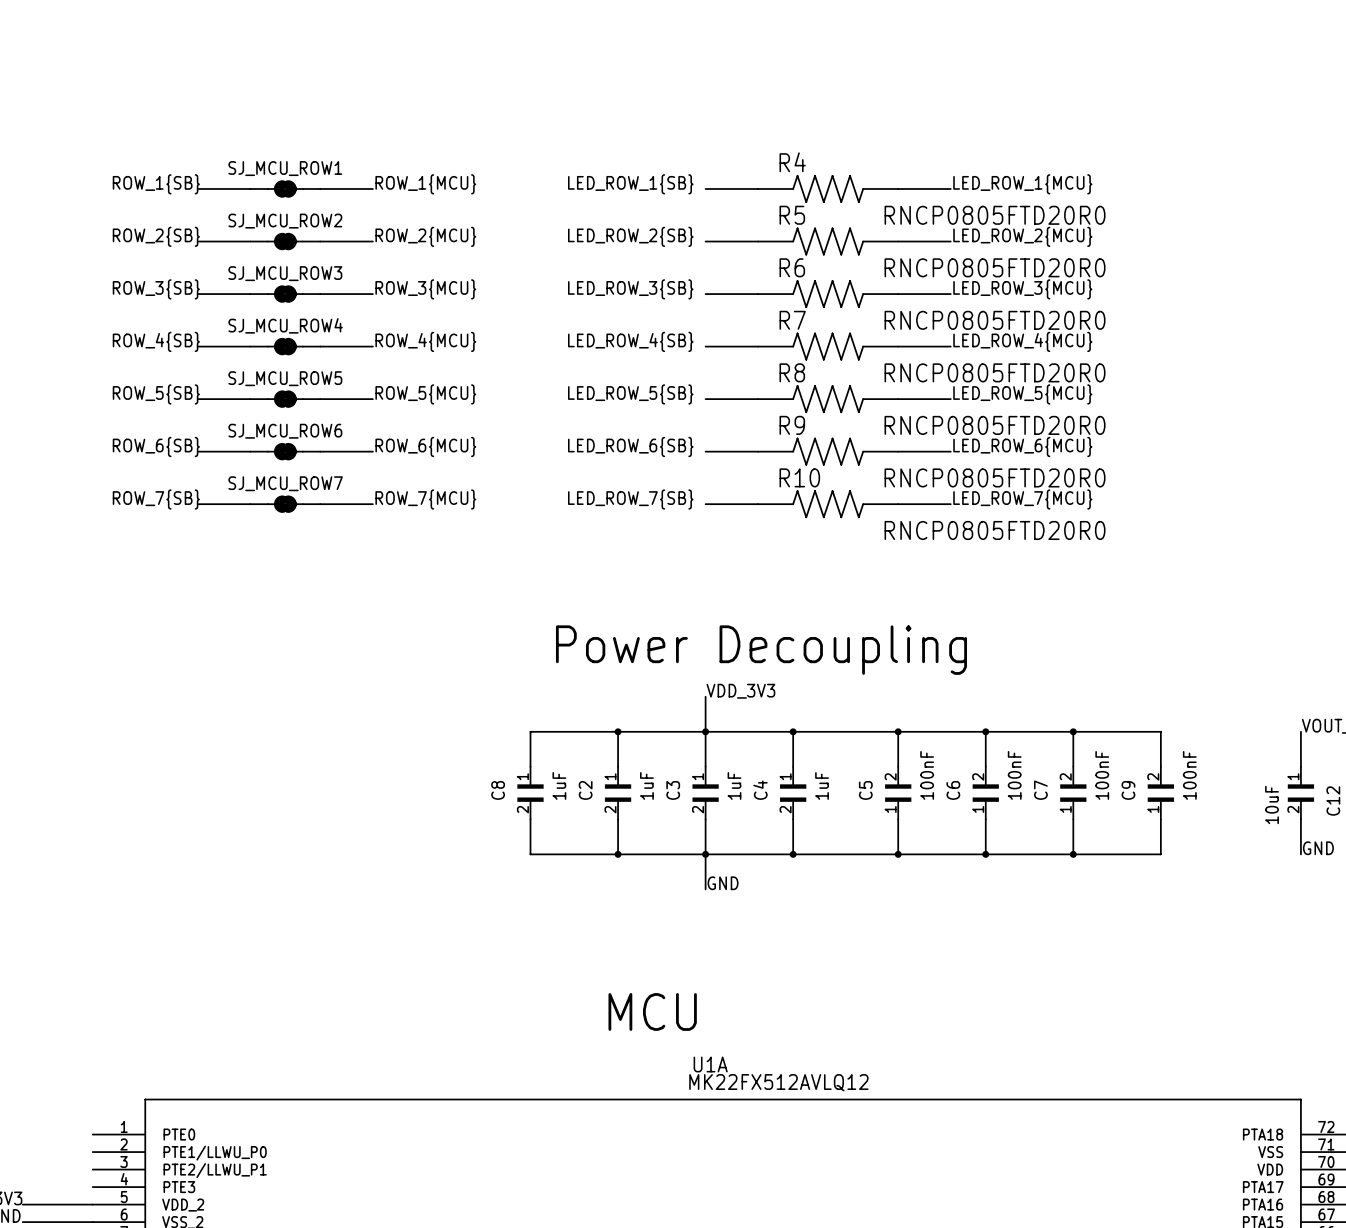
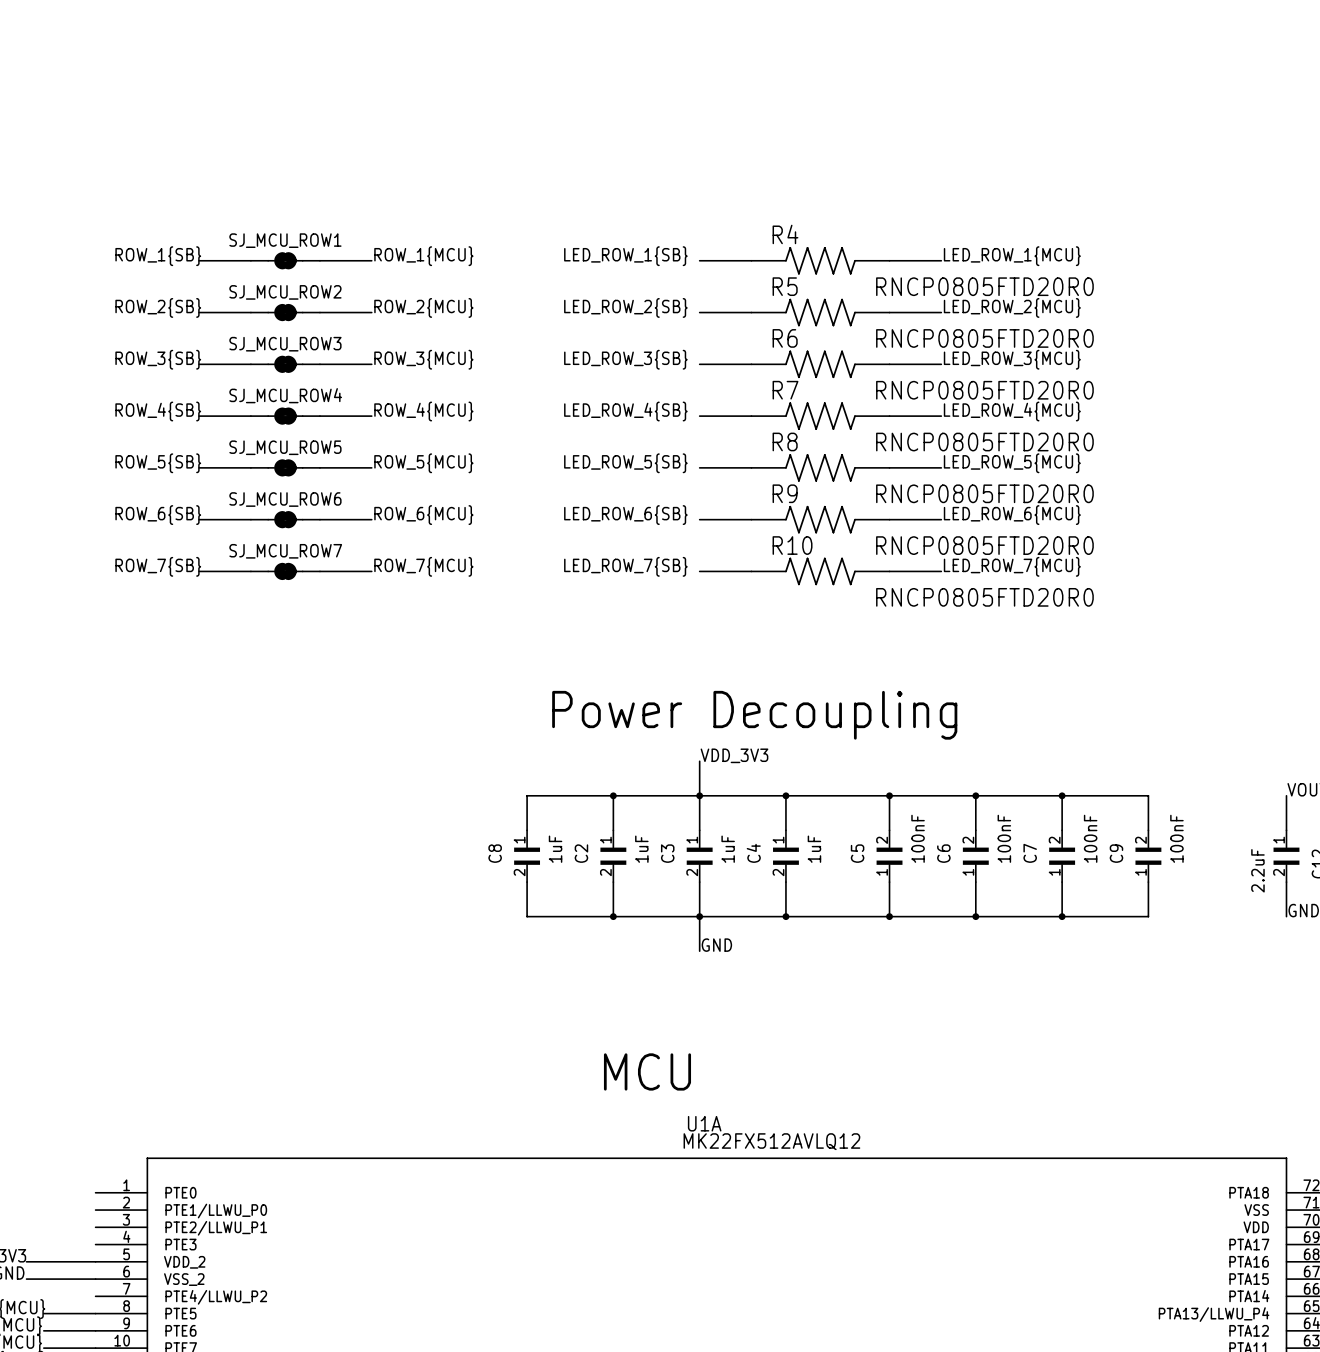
C12 value: 10uF (1272, 804) -> 2.2uF (1257, 870)

